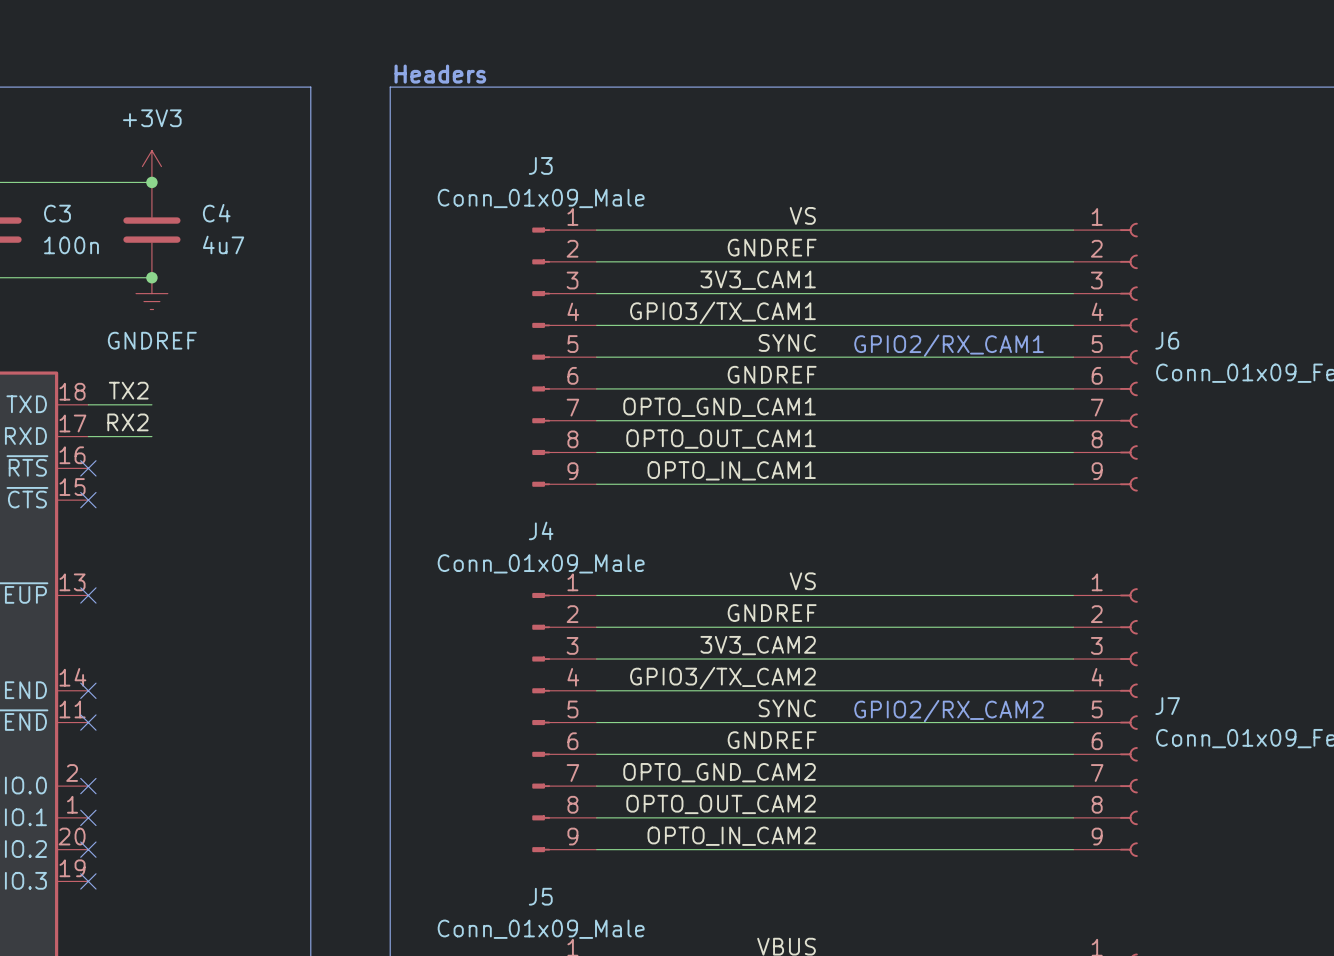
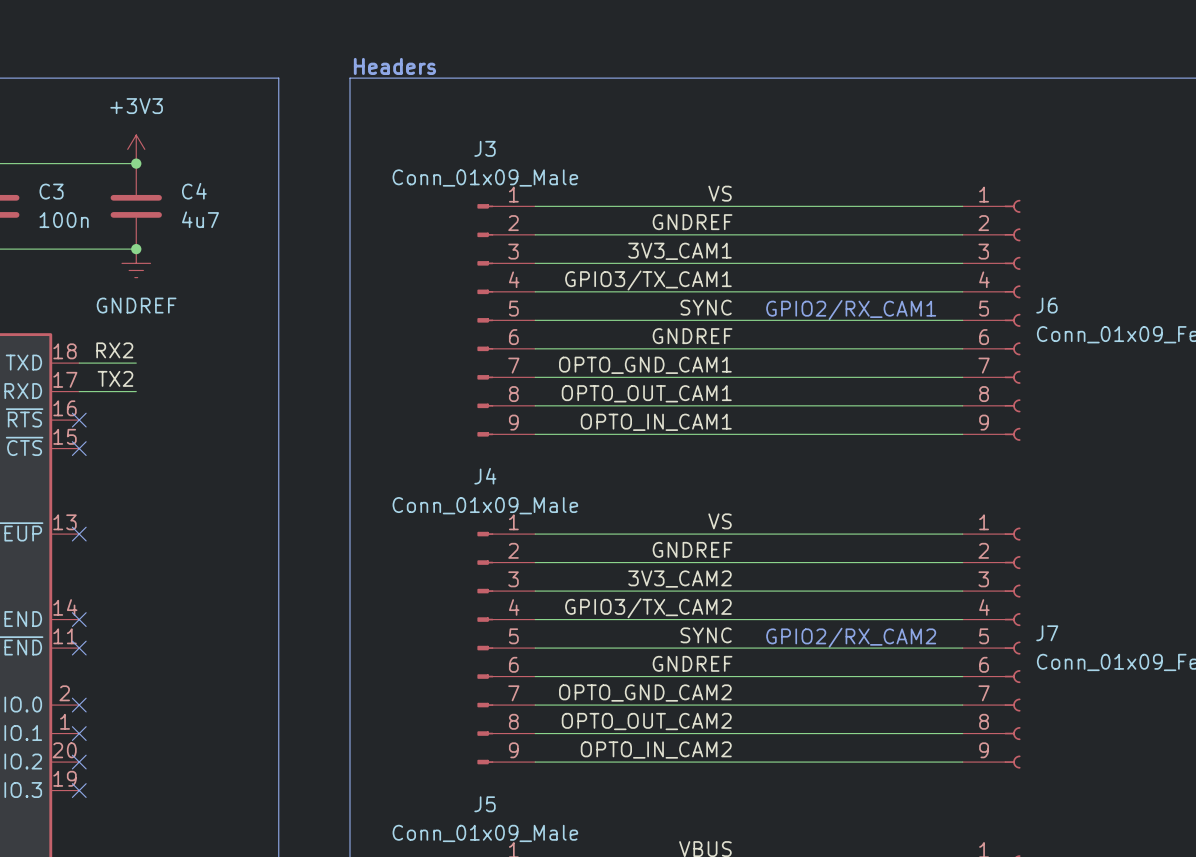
label: TX2 (128, 390) -> RX2 (114, 350)
label: RX2 (127, 422) -> TX2 (115, 378)

